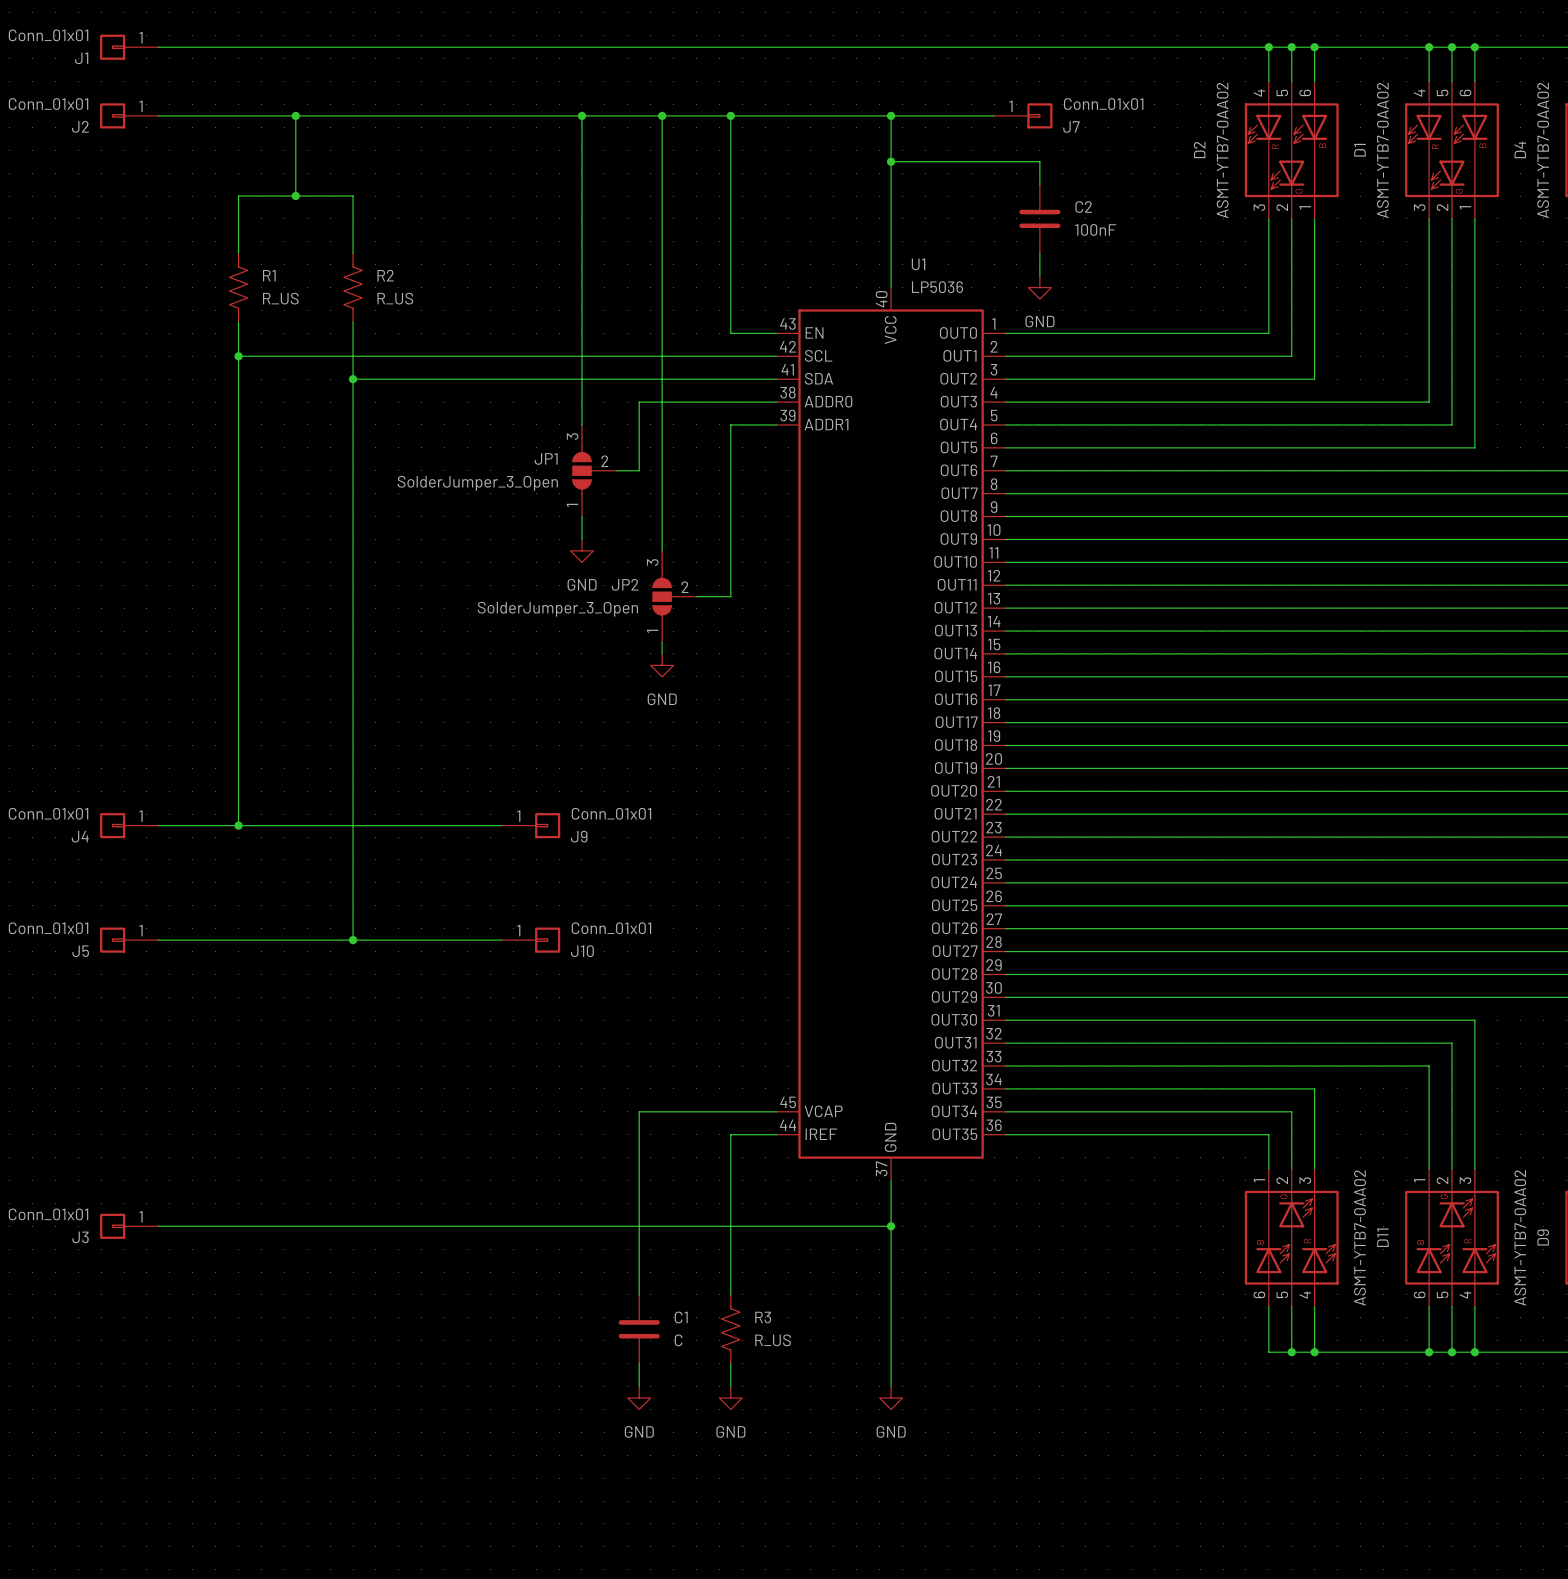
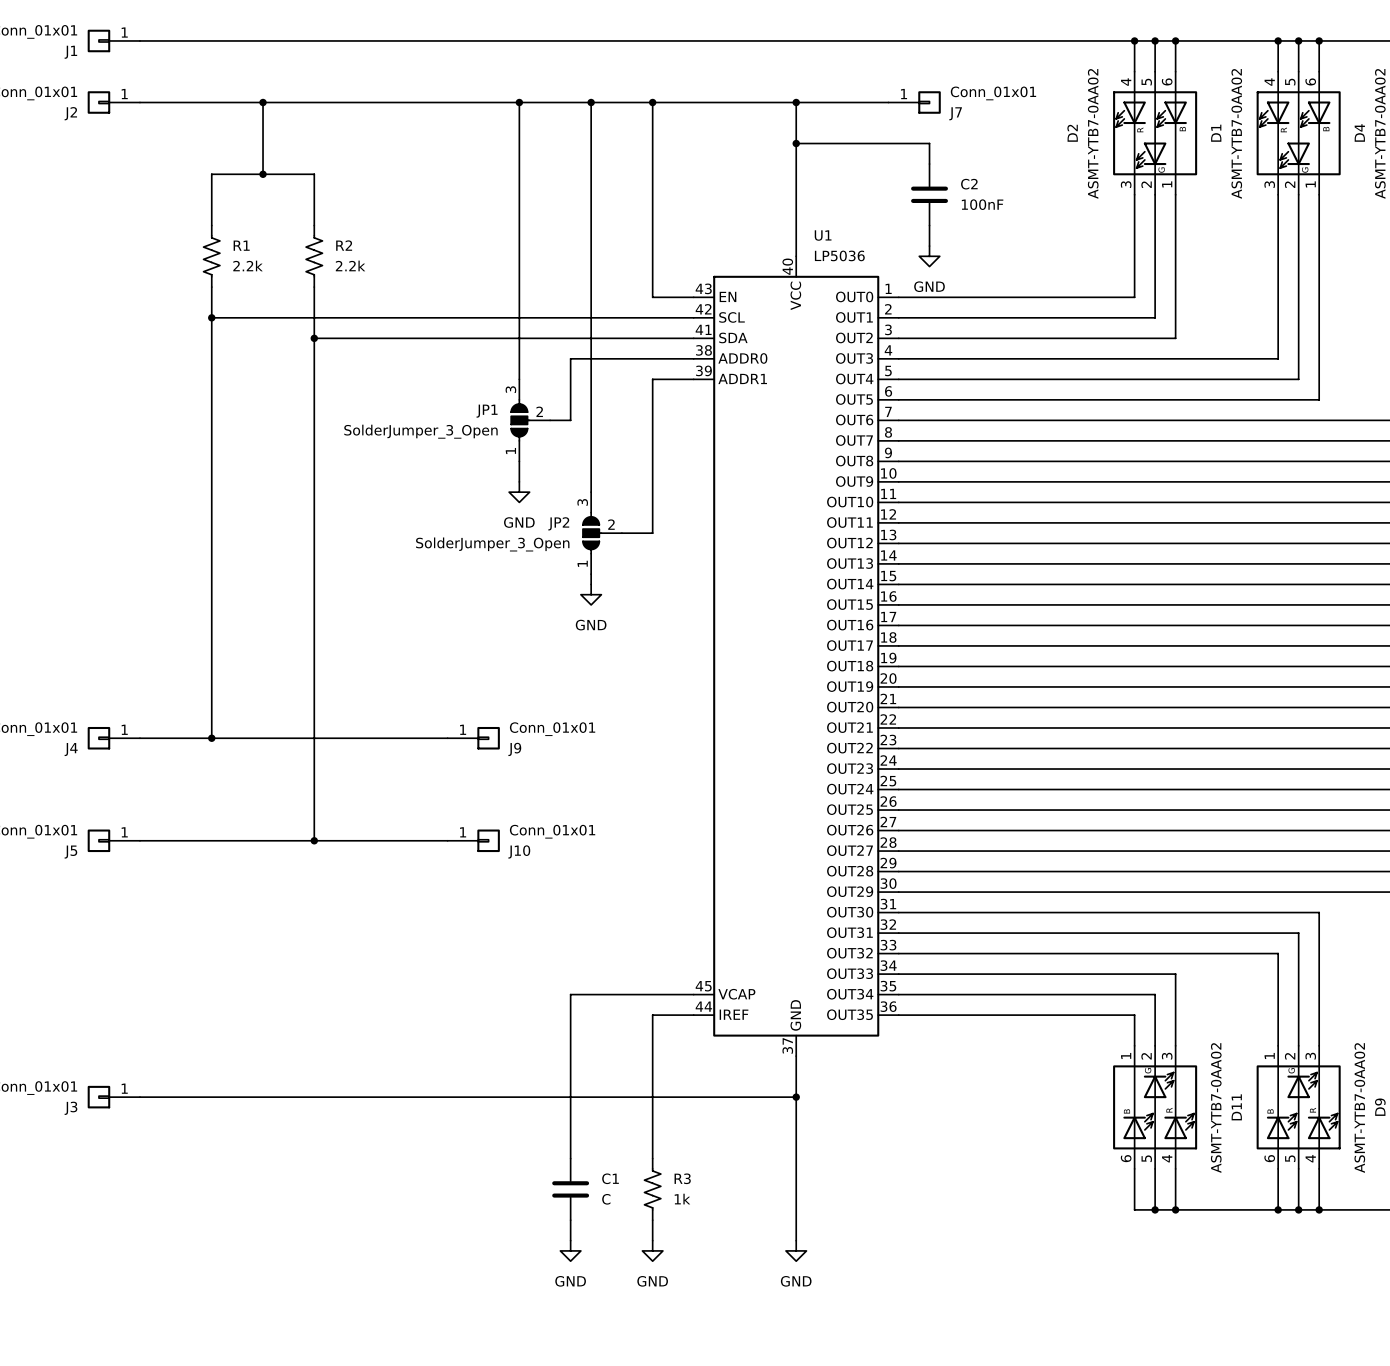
R1 value: R_US (280, 298) -> 2.2k (248, 265)
R2 value: R_US (395, 298) -> 2.2k (350, 265)
R3 value: R_US (773, 1340) -> 1k (682, 1199)

